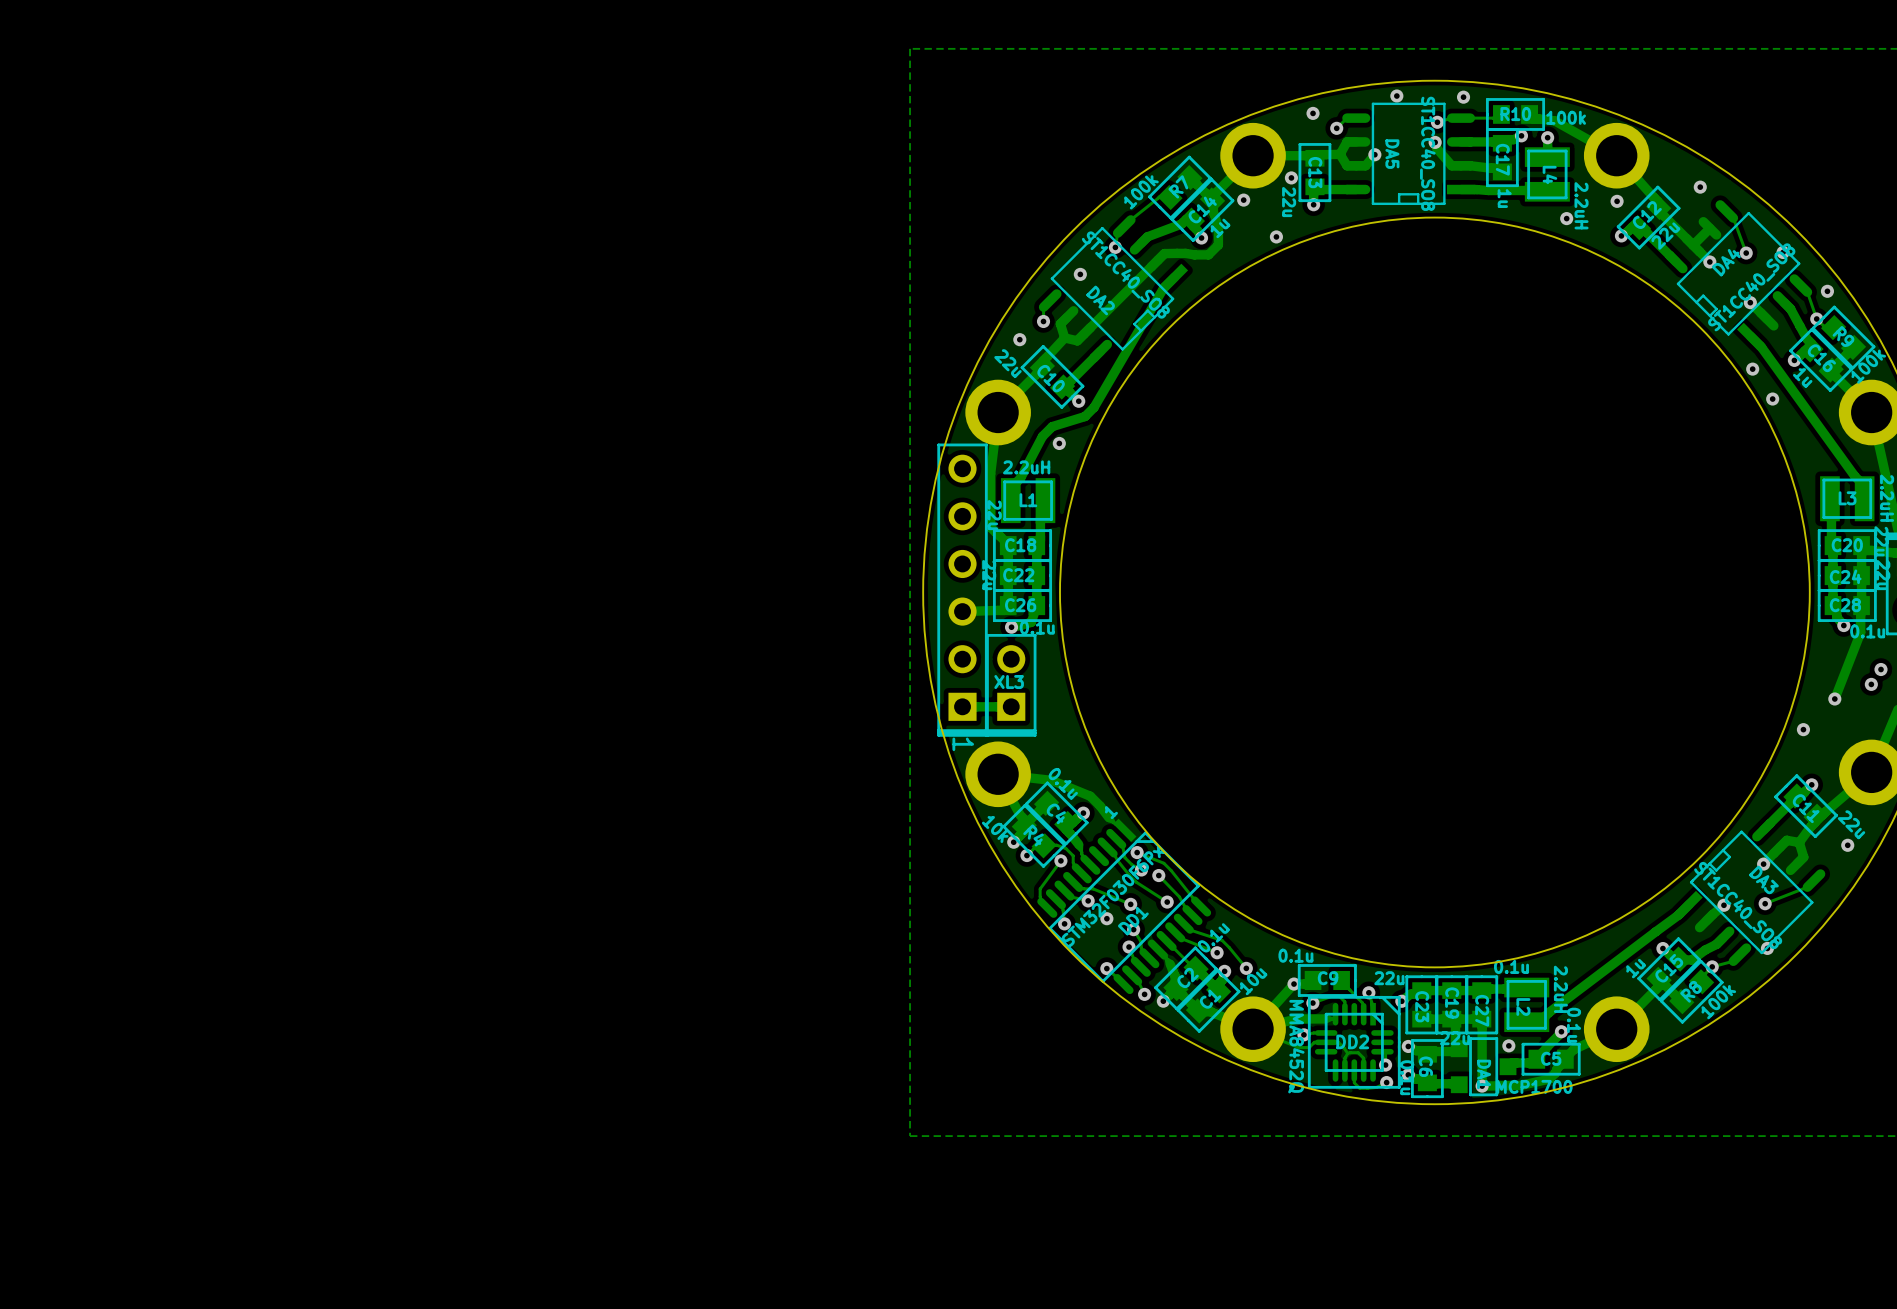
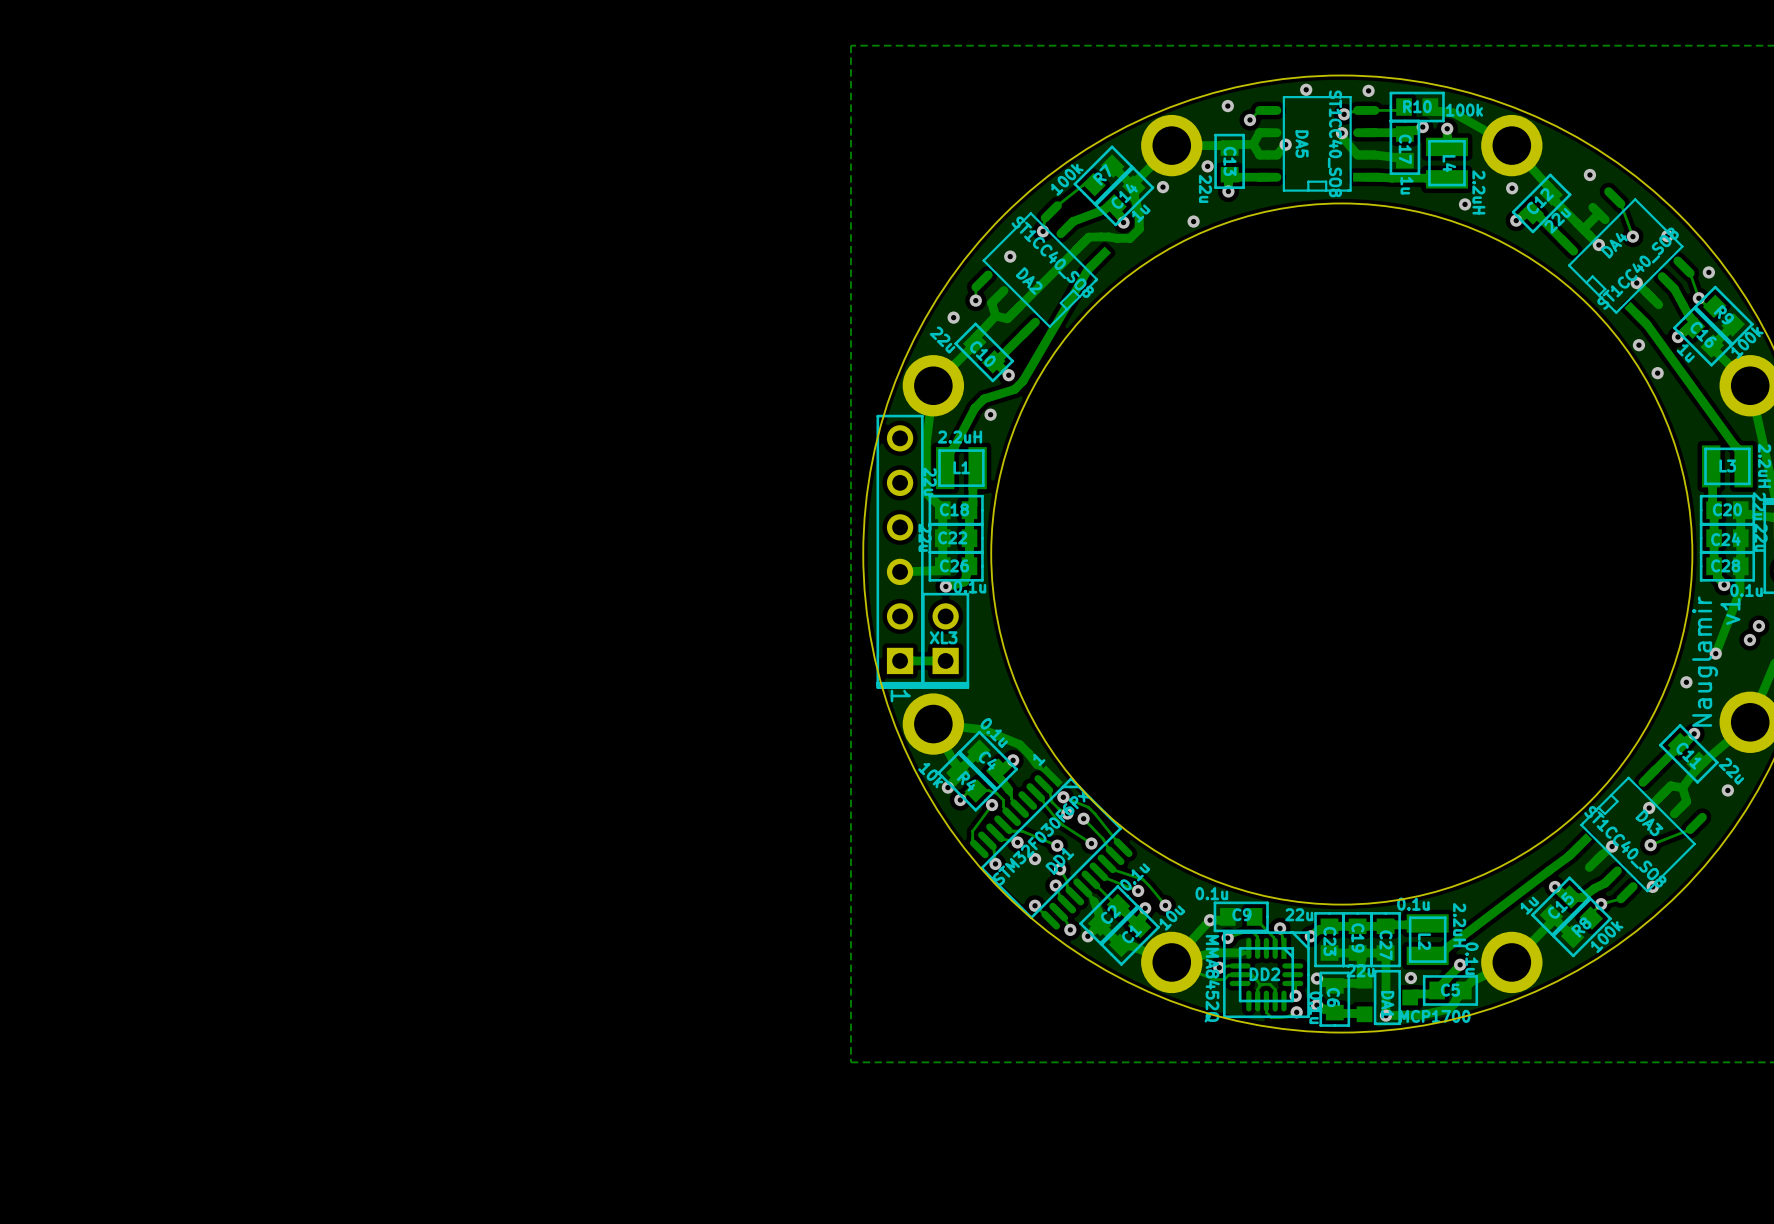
text: none -> v1 (1730, 611)
text: none -> Nauglamir (1705, 661)

